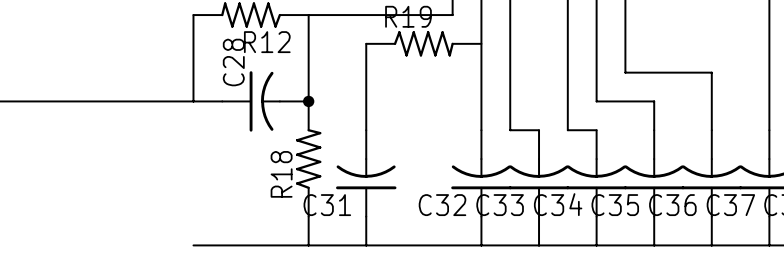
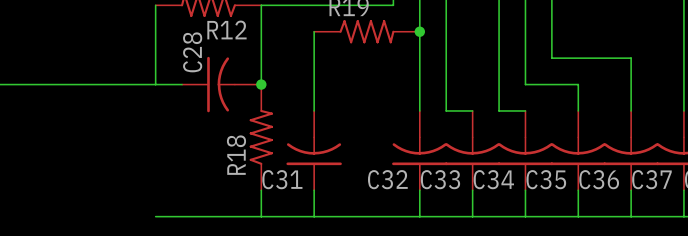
junction: none -> (419, 31)

